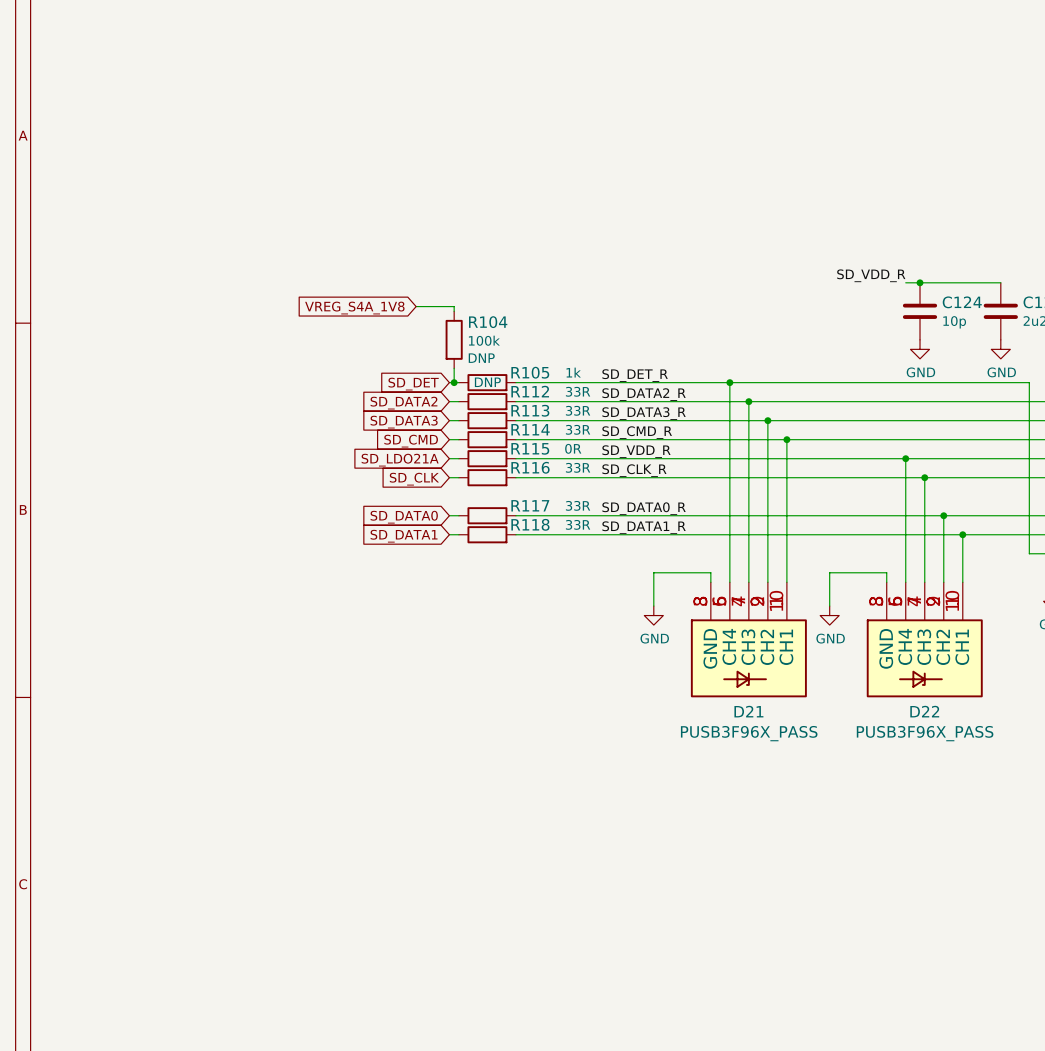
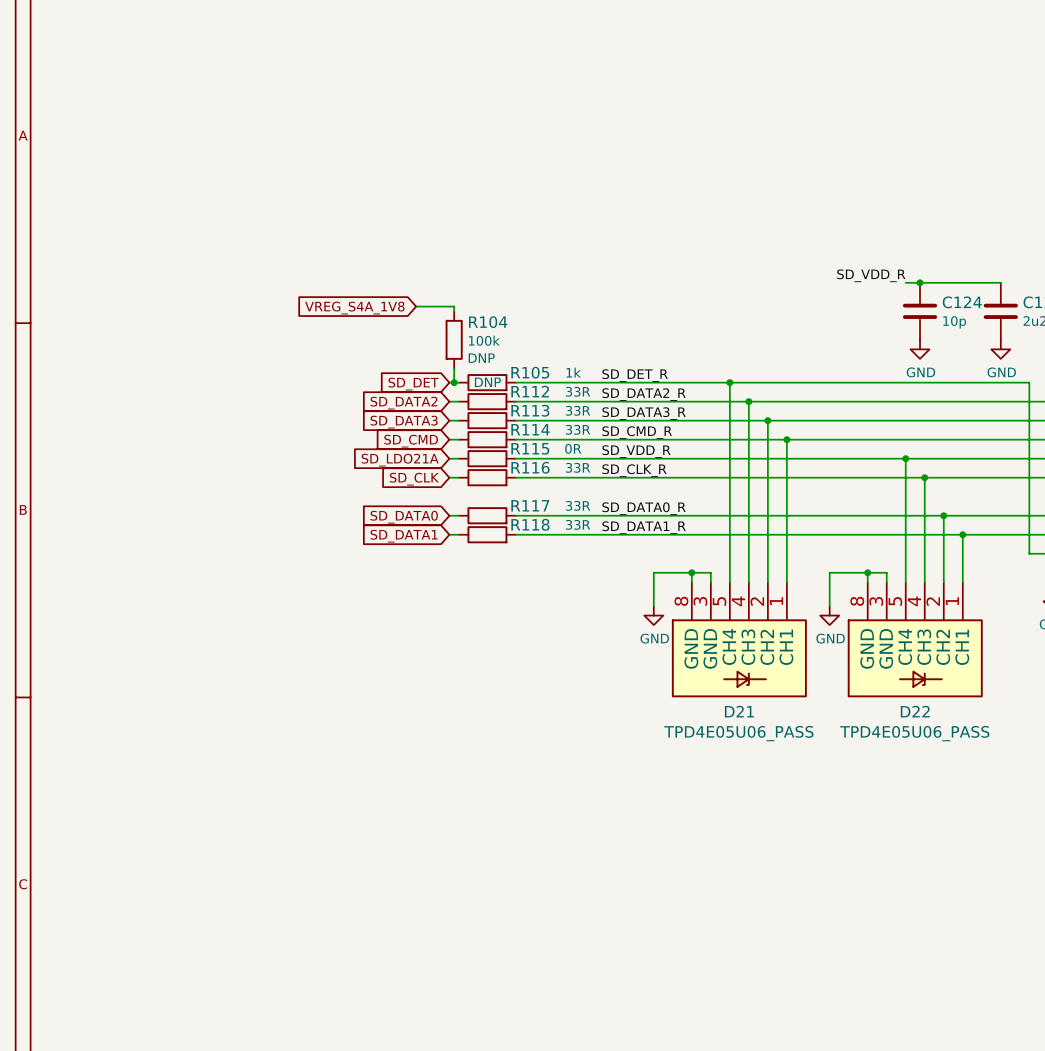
wire: none -> (691, 572) (691, 582)
junction: none -> (691, 572)
wire: none -> (867, 572) (867, 582)
junction: none -> (867, 572)
D21 symbol: [690, 582, 807, 698] -> [671, 582, 807, 698]
D22 symbol: [866, 582, 983, 698] -> [847, 582, 983, 698]
D21 value: PUSB3F96X_PASS (749, 733) -> TPD4E05U06_PASS (738, 733)
D22 value: PUSB3F96X_PASS (925, 733) -> TPD4E05U06_PASS (914, 733)

